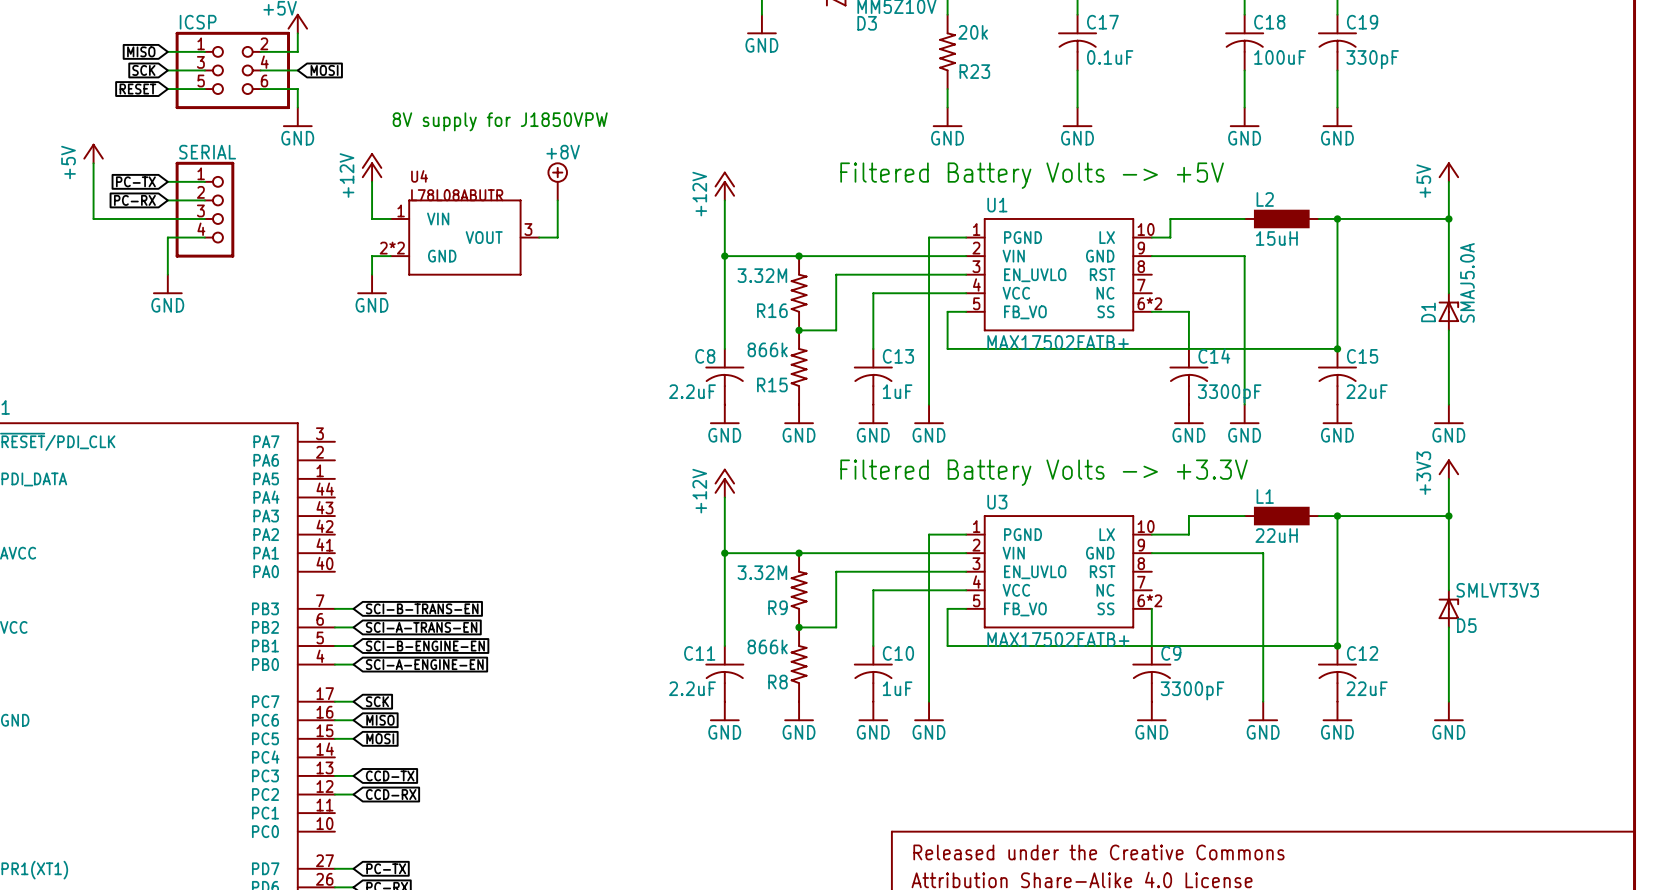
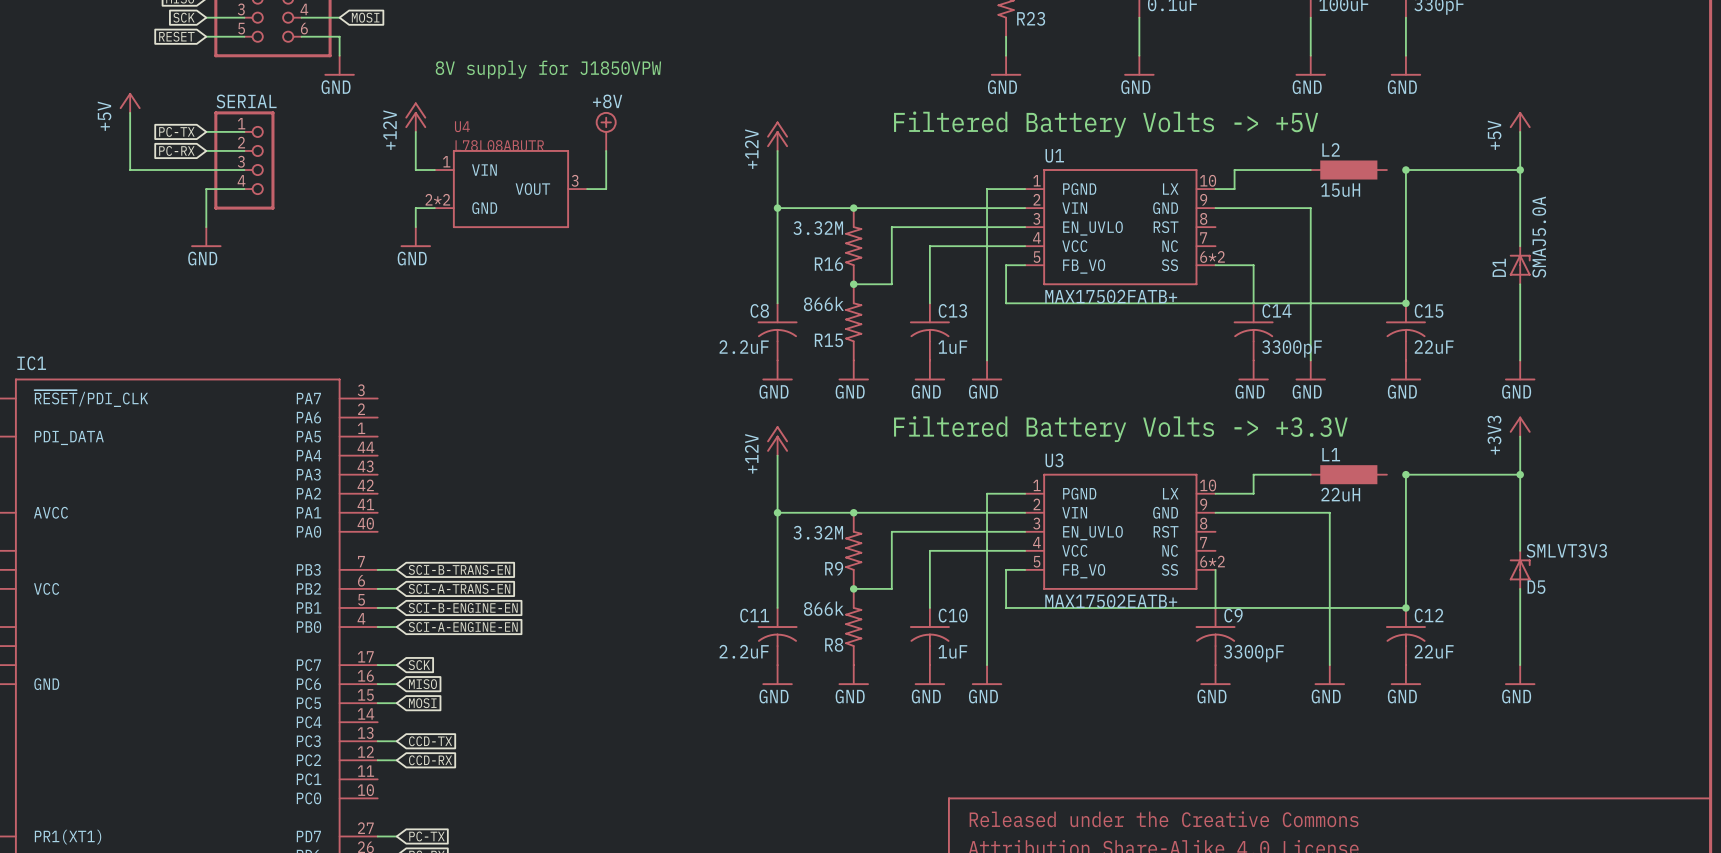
wire: (1318, 218) (1337, 218) -> none
wire: (1318, 516) (1337, 516) -> none

